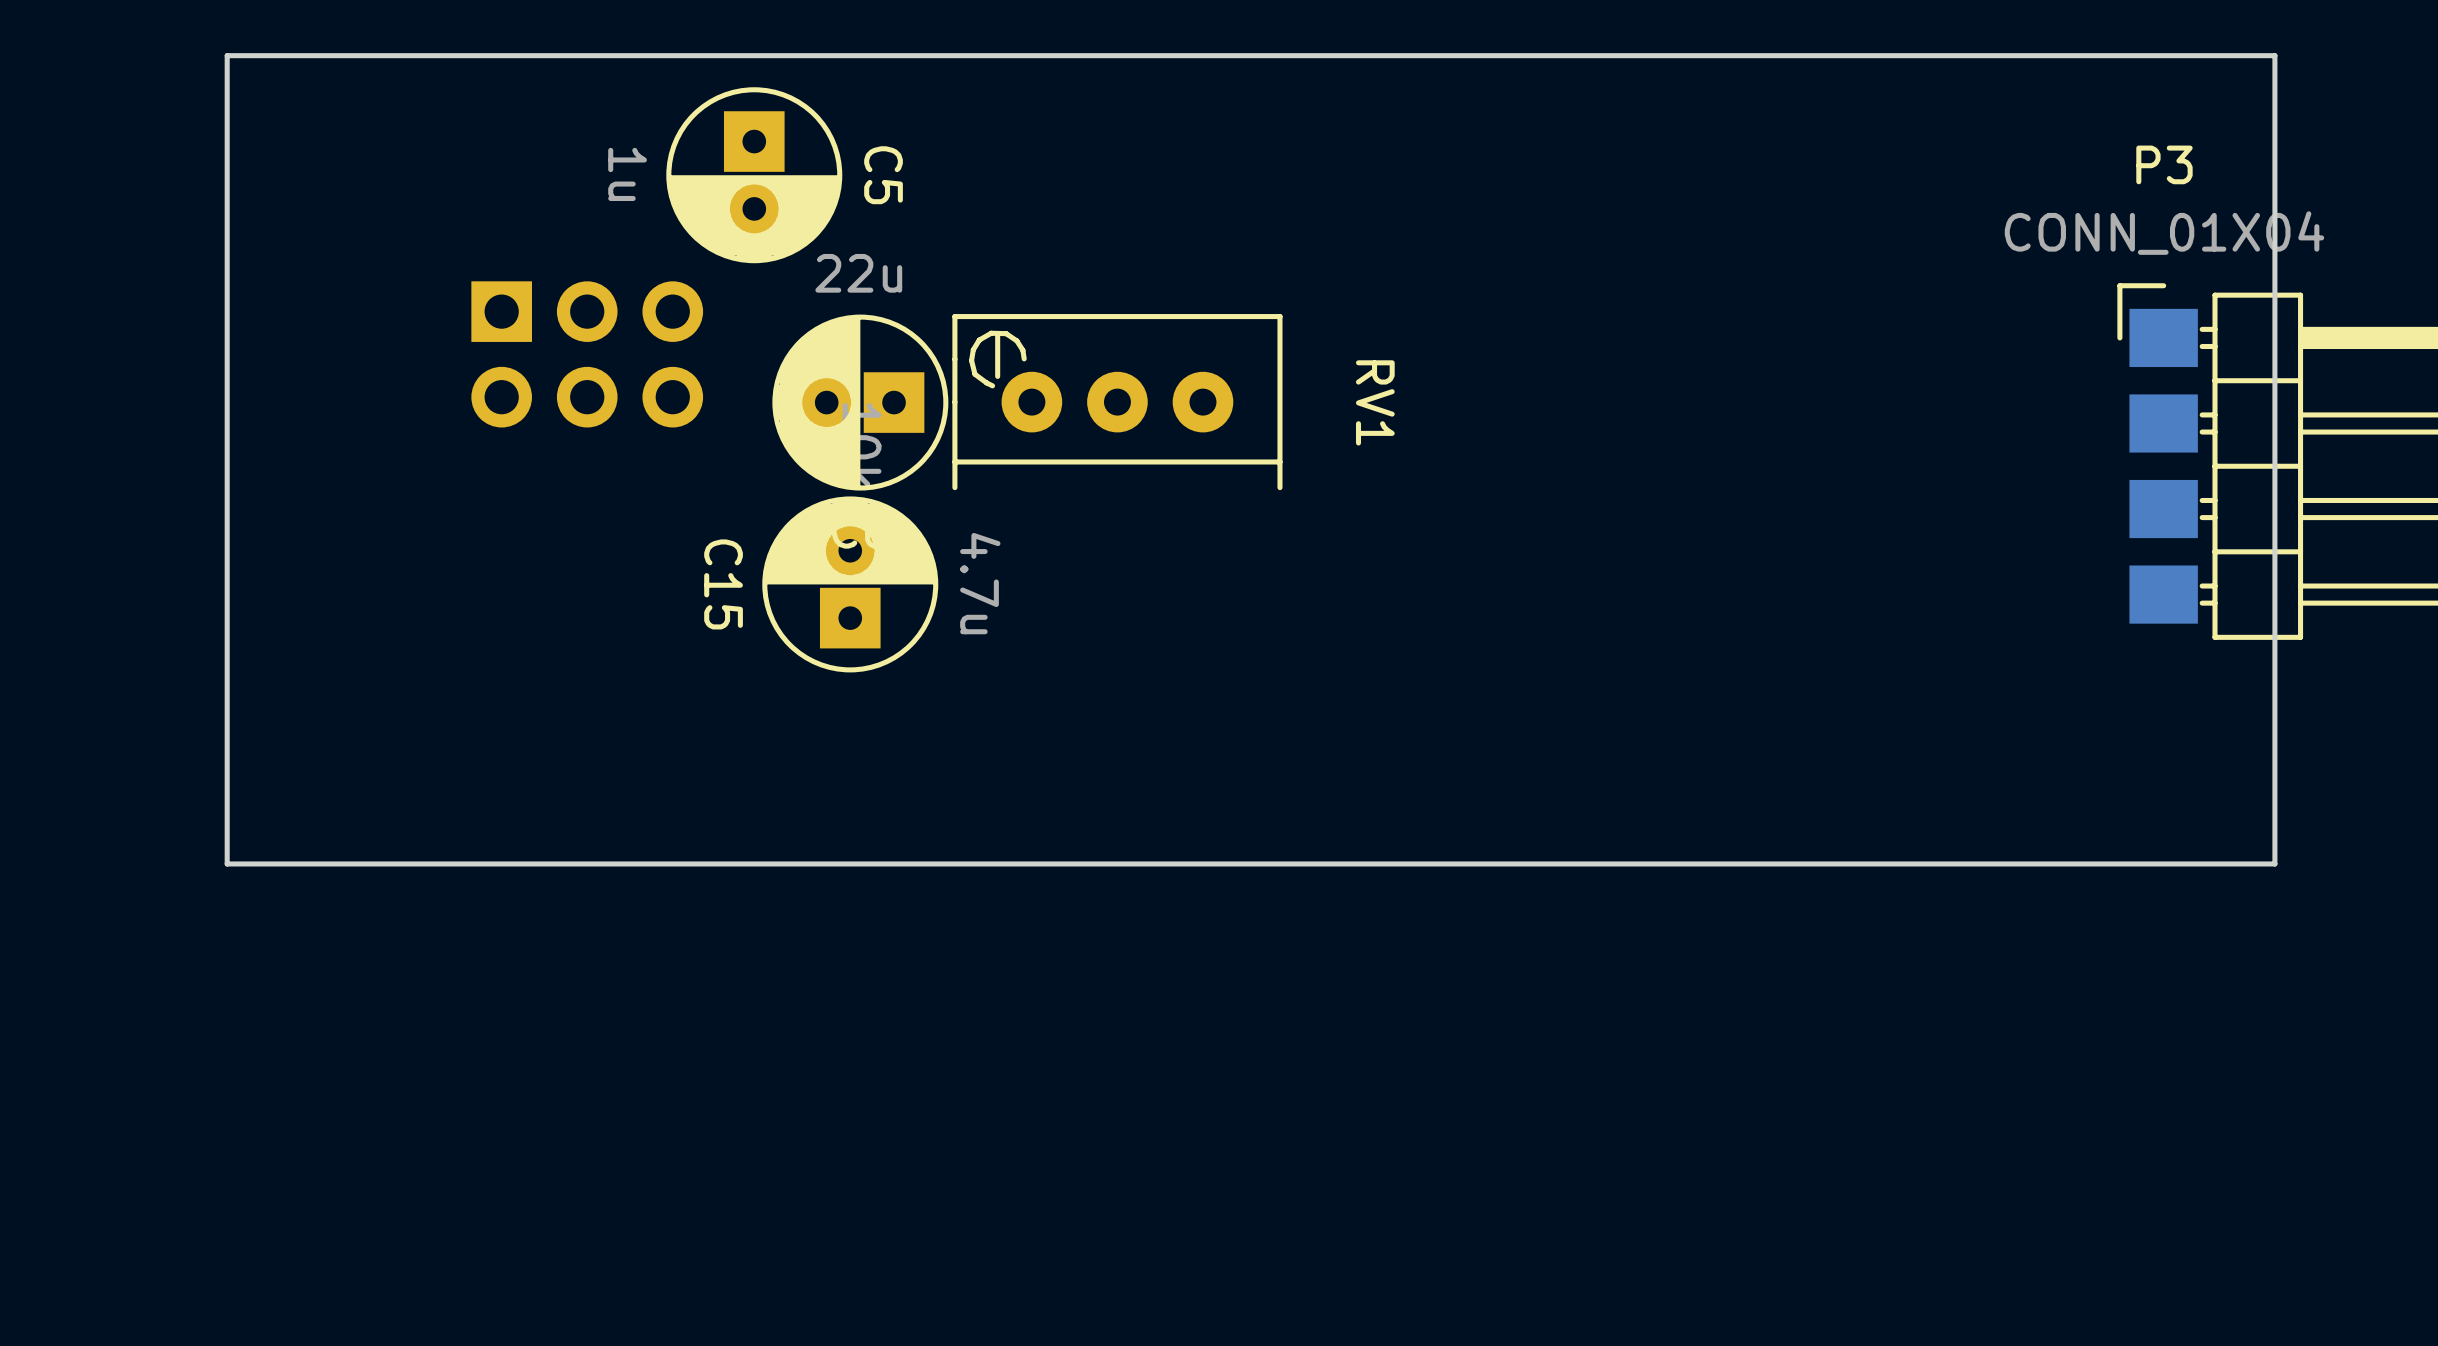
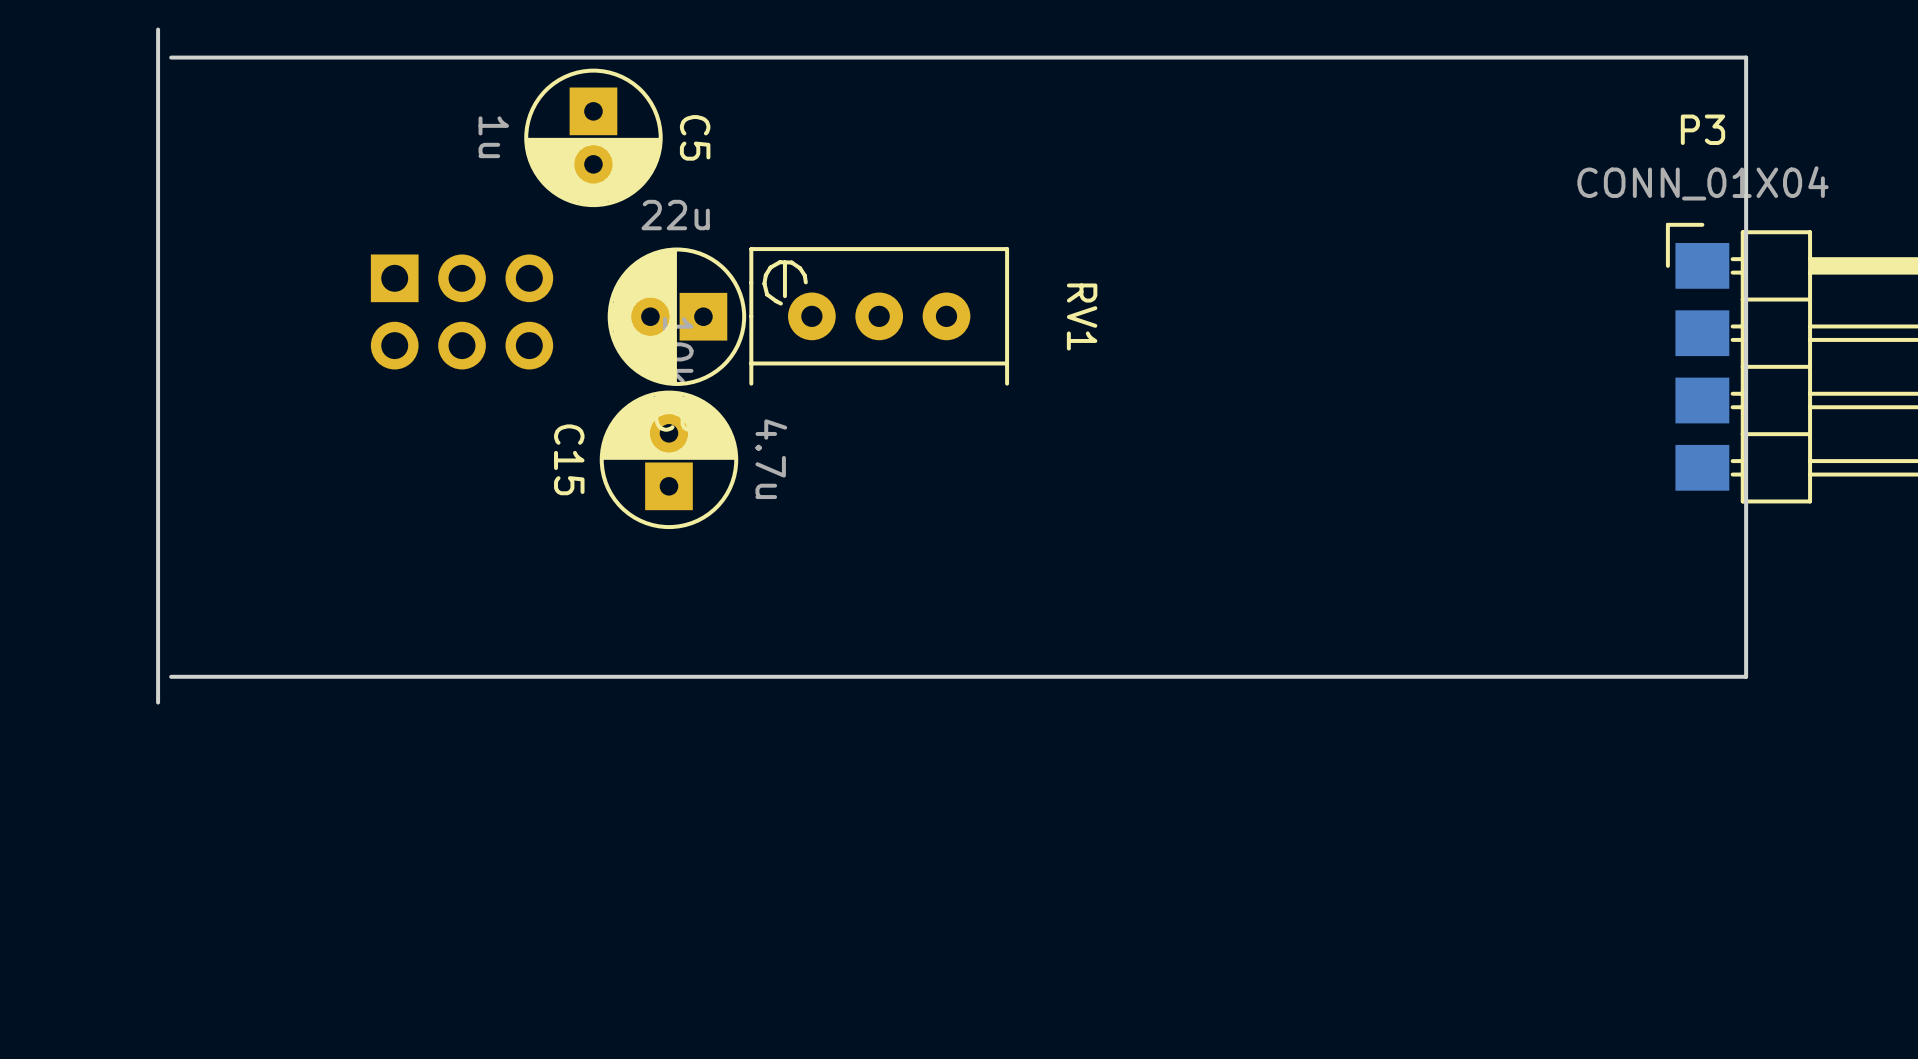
board edge: none -> (158, 29) (158, 702)
board edge: (2274, 55) (227, 55) (227, 863) (2274, 863) (2274, 55) -> none
board edge: none -> (171, 57) (1746, 57) (1746, 676) (171, 676)
part position: (587, 354) -> (462, 311)

